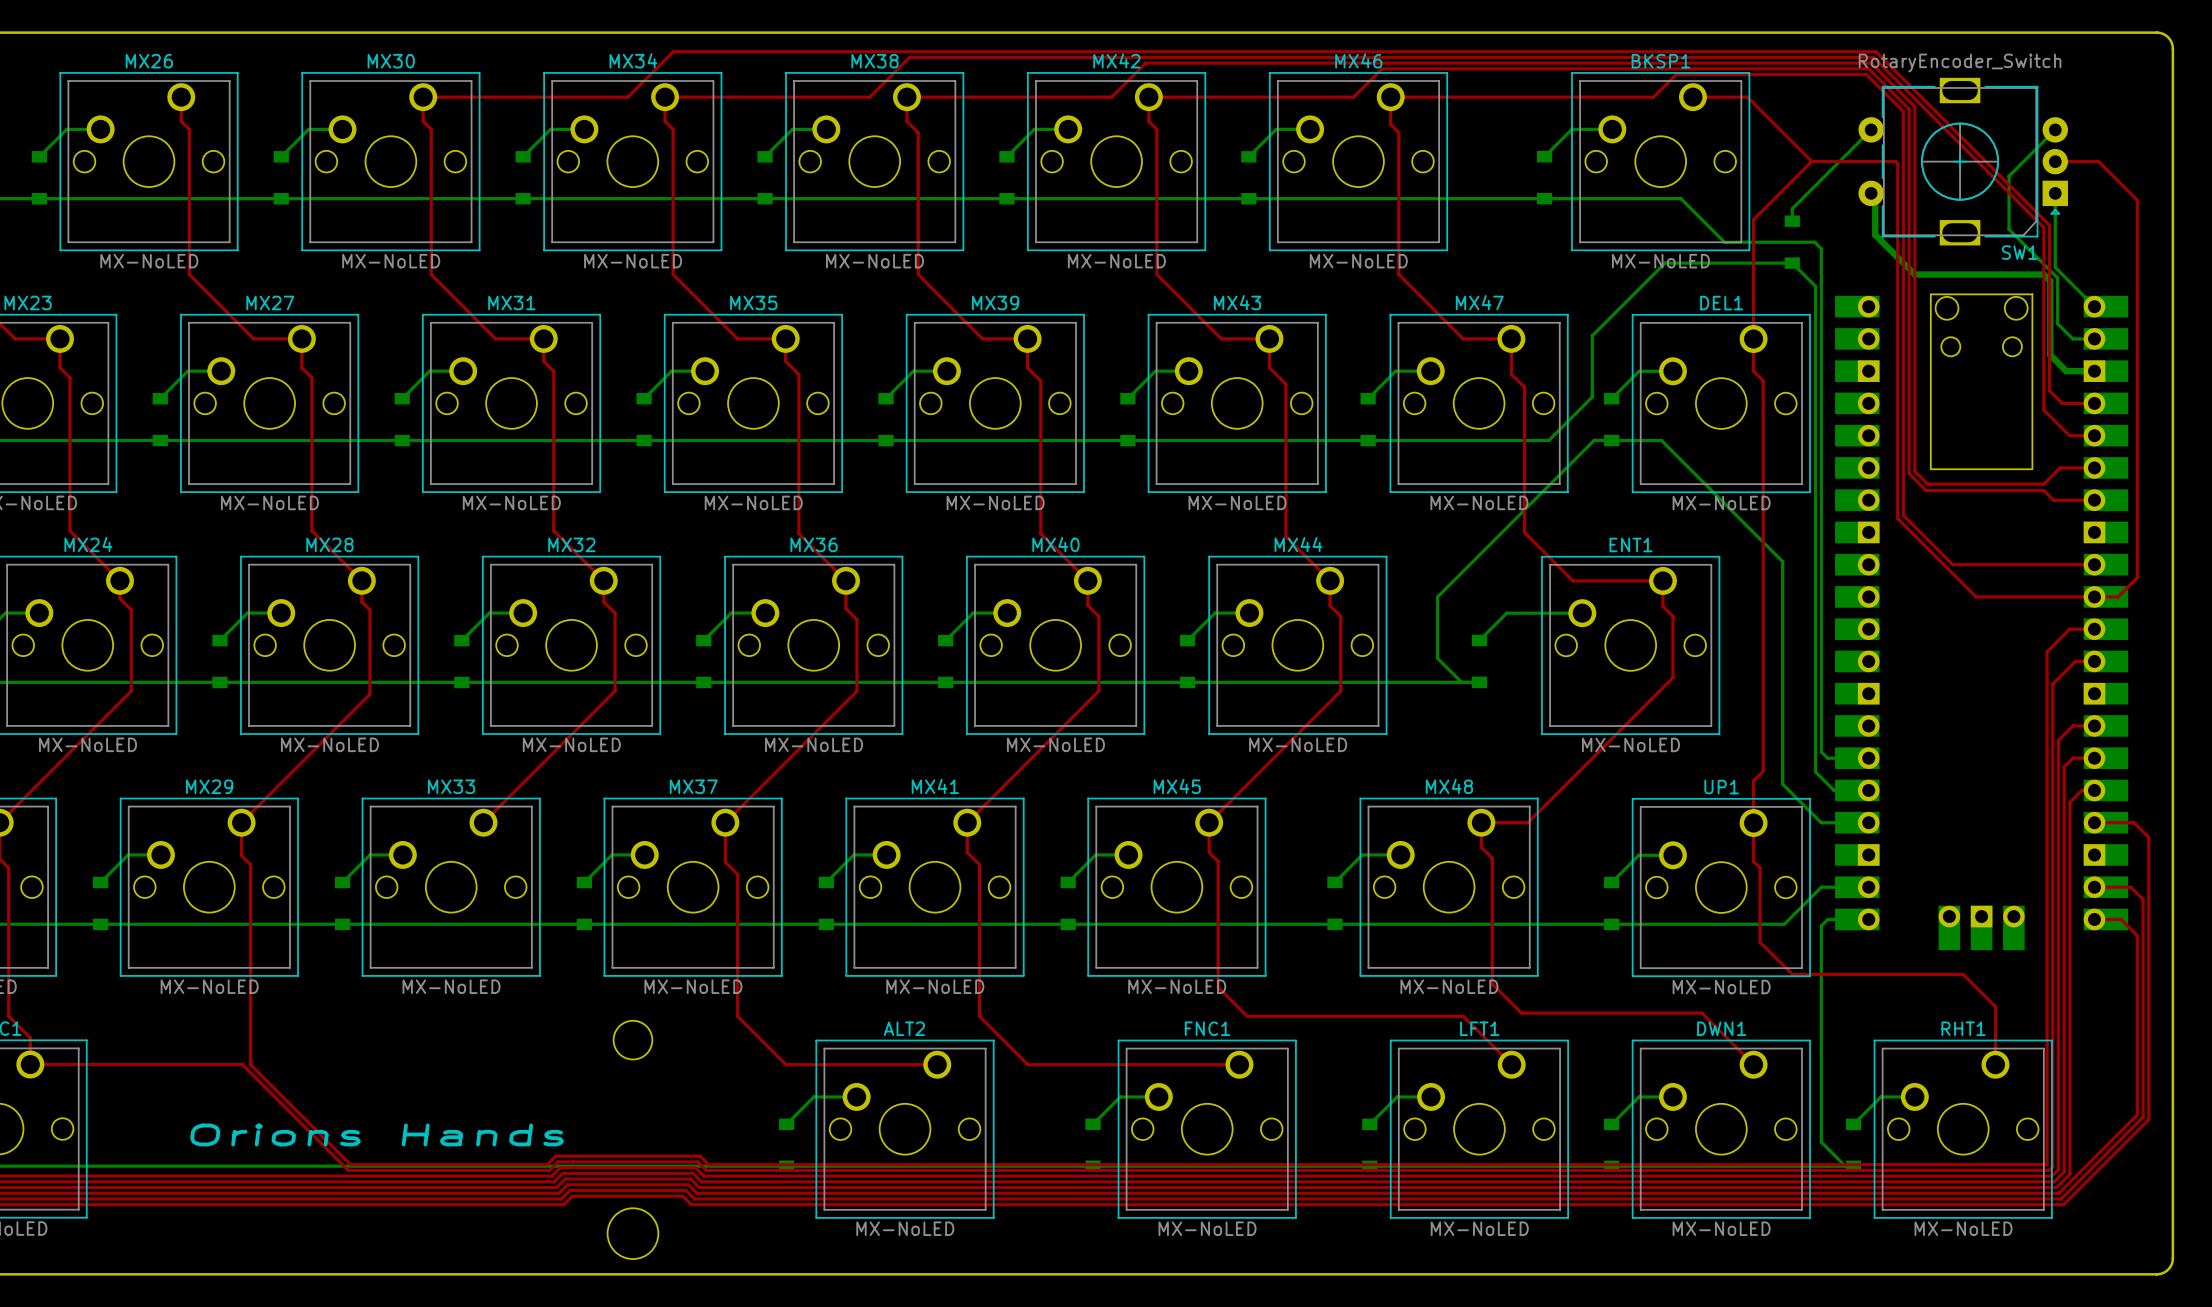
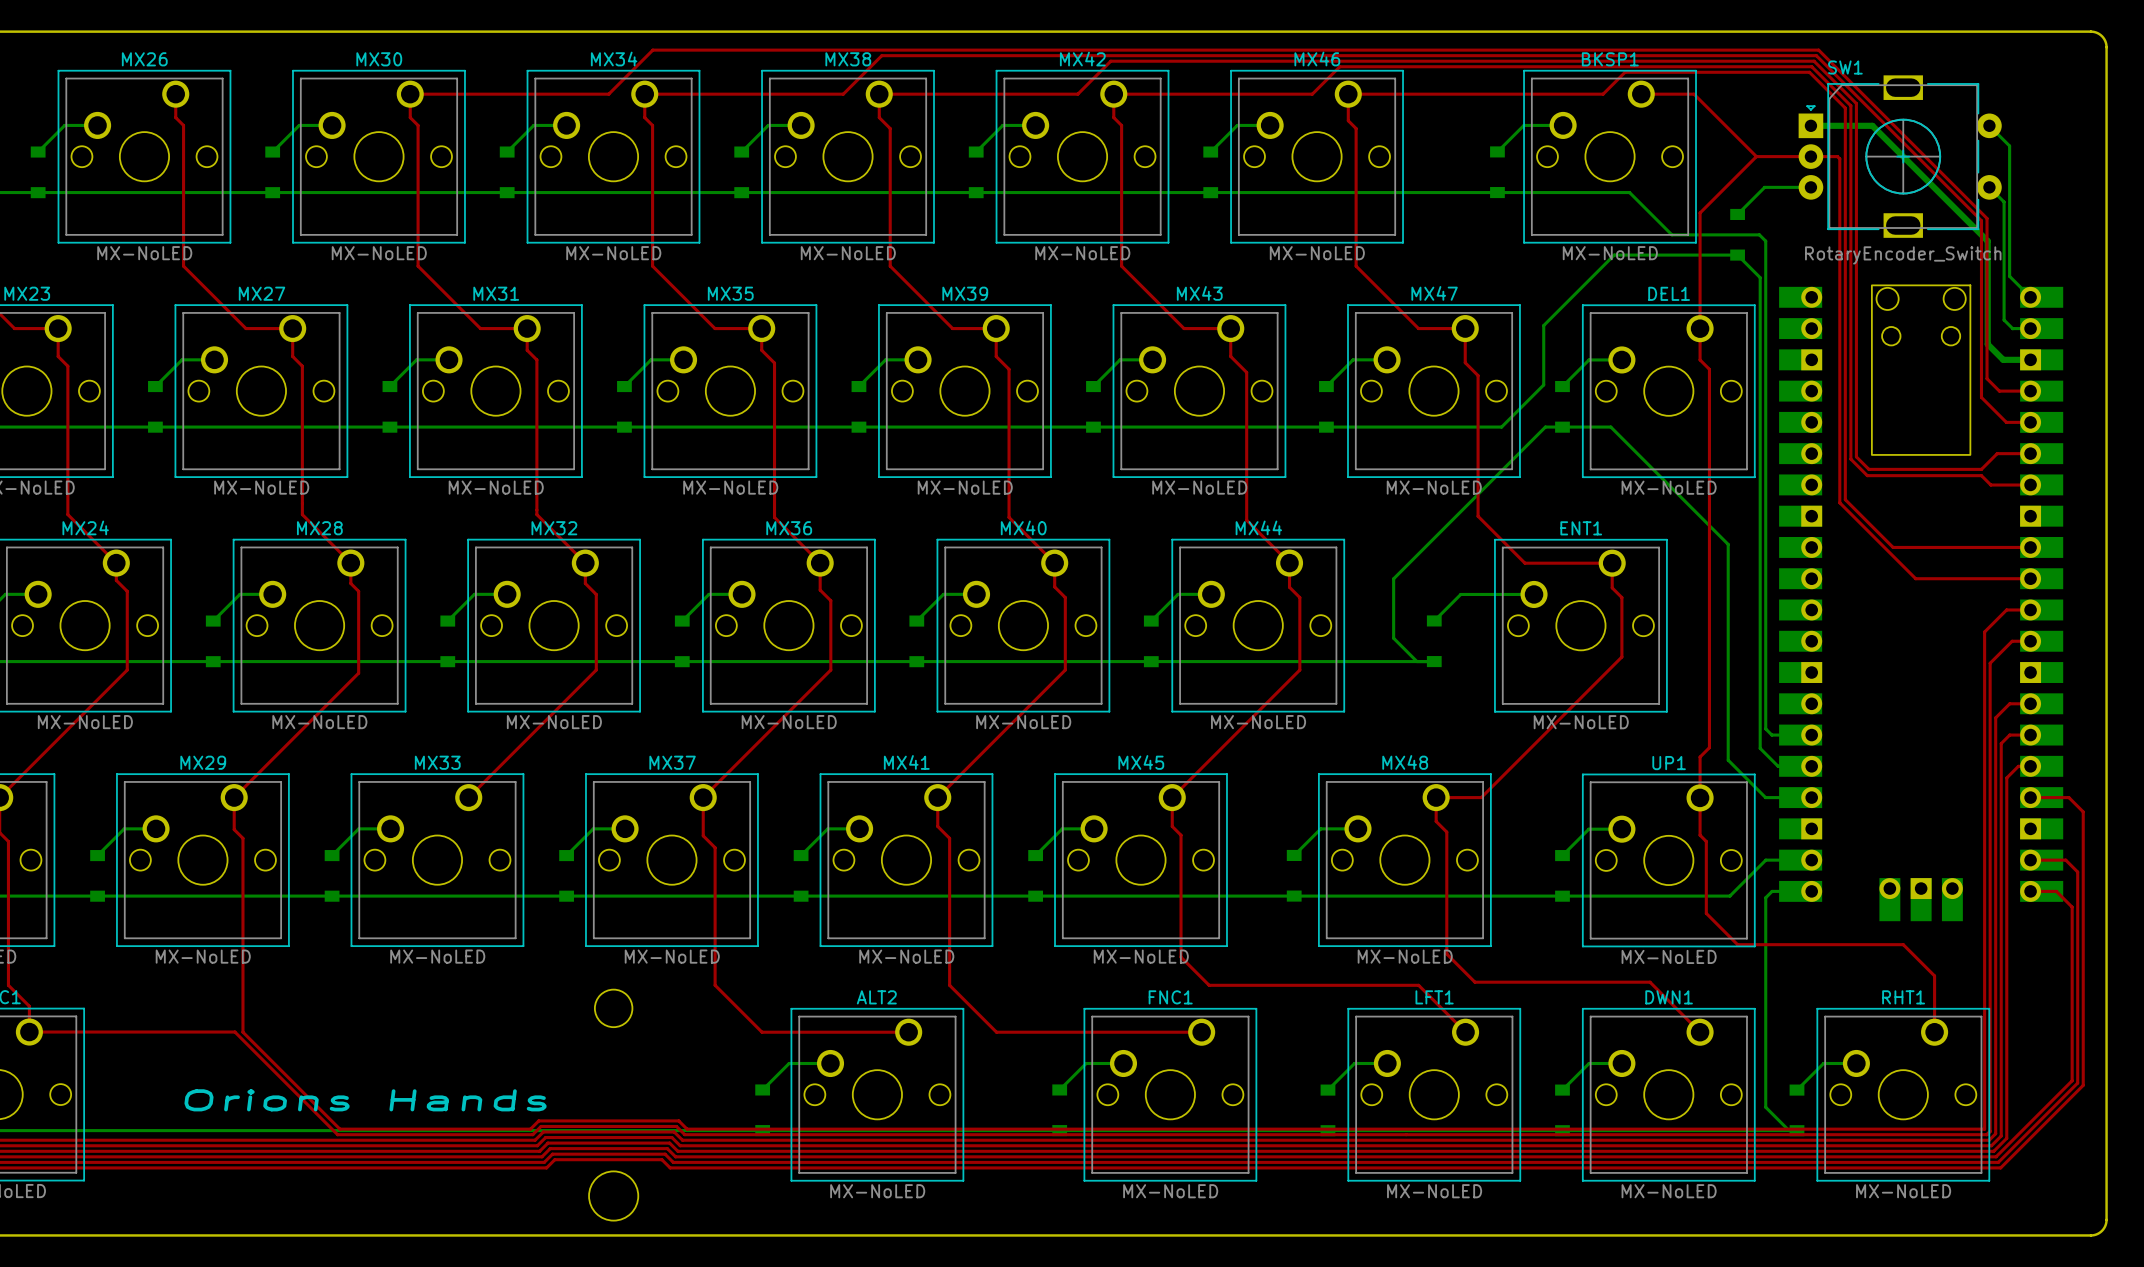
bottom track: (1871, 129) (1792, 208) (1792, 221) -> (1810, 187) (1764, 187) (1737, 214)
bottom track: (2055, 129) (2009, 176) (2009, 229) (2057, 277) (2057, 323) (2072, 338) (2076, 338) -> (1989, 187) (2004, 202) (2004, 320) (2012, 328)
SW1 rotation: 0° (1963, 161) -> 180° (1900, 156)
top track: (2055, 161) (2098, 161) (2137, 200) (2137, 577) (2118, 596) (2094, 596) -> none
bottom track: (1875, 193) (1875, 234) (1914, 274) (2043, 274) (2050, 280) -> (1810, 125) (1872, 125) (1987, 241) (1987, 272)
bottom track: (2055, 193) (2055, 267) (2072, 285) -> (1989, 125) (2009, 146) (2009, 276)

